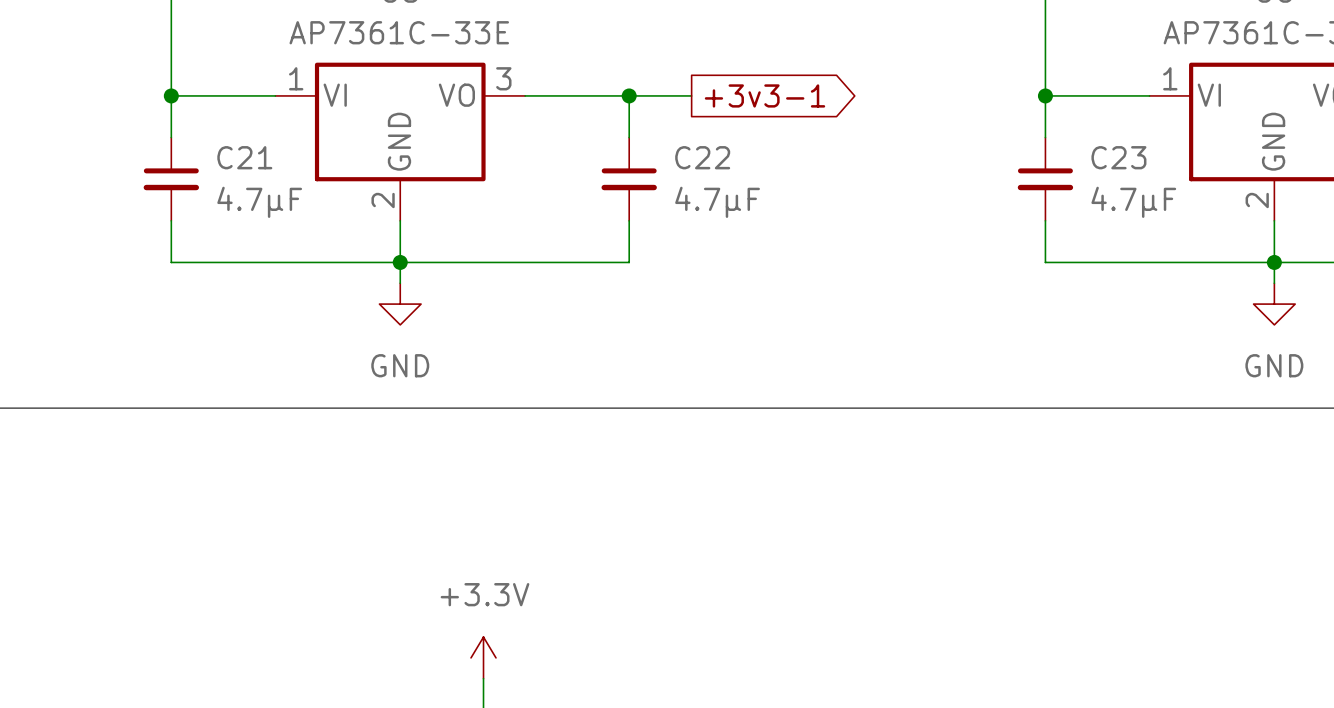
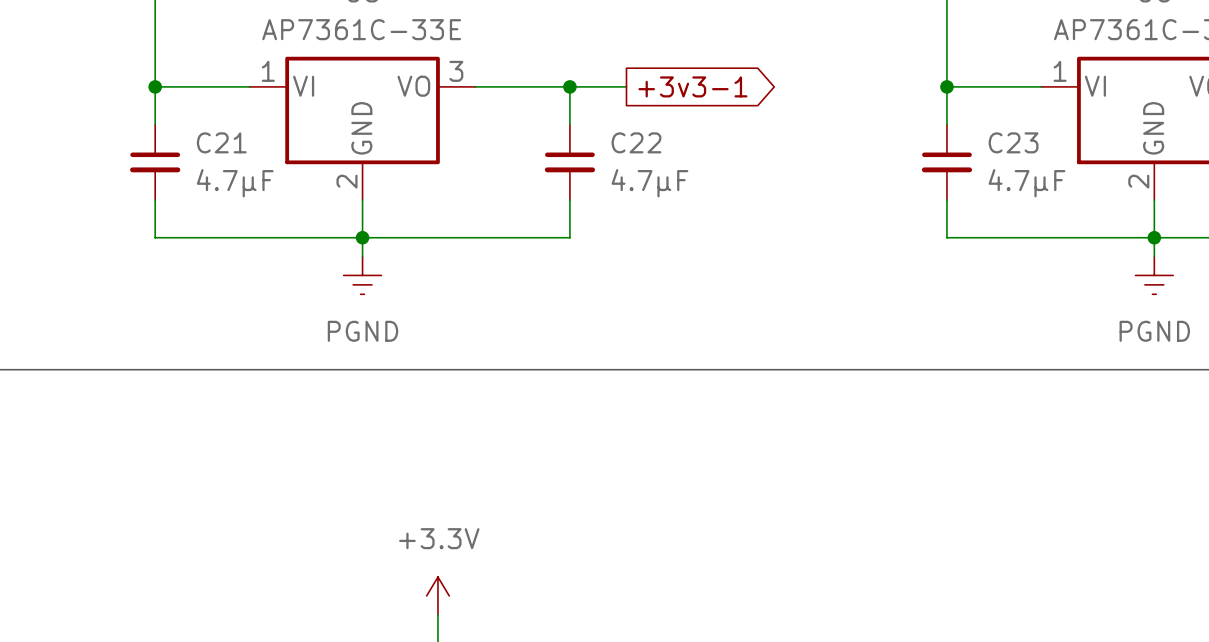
power symbol: GND (400, 304) -> PGND (362, 275)
power symbol: GND (1274, 304) -> PGND (1154, 275)

